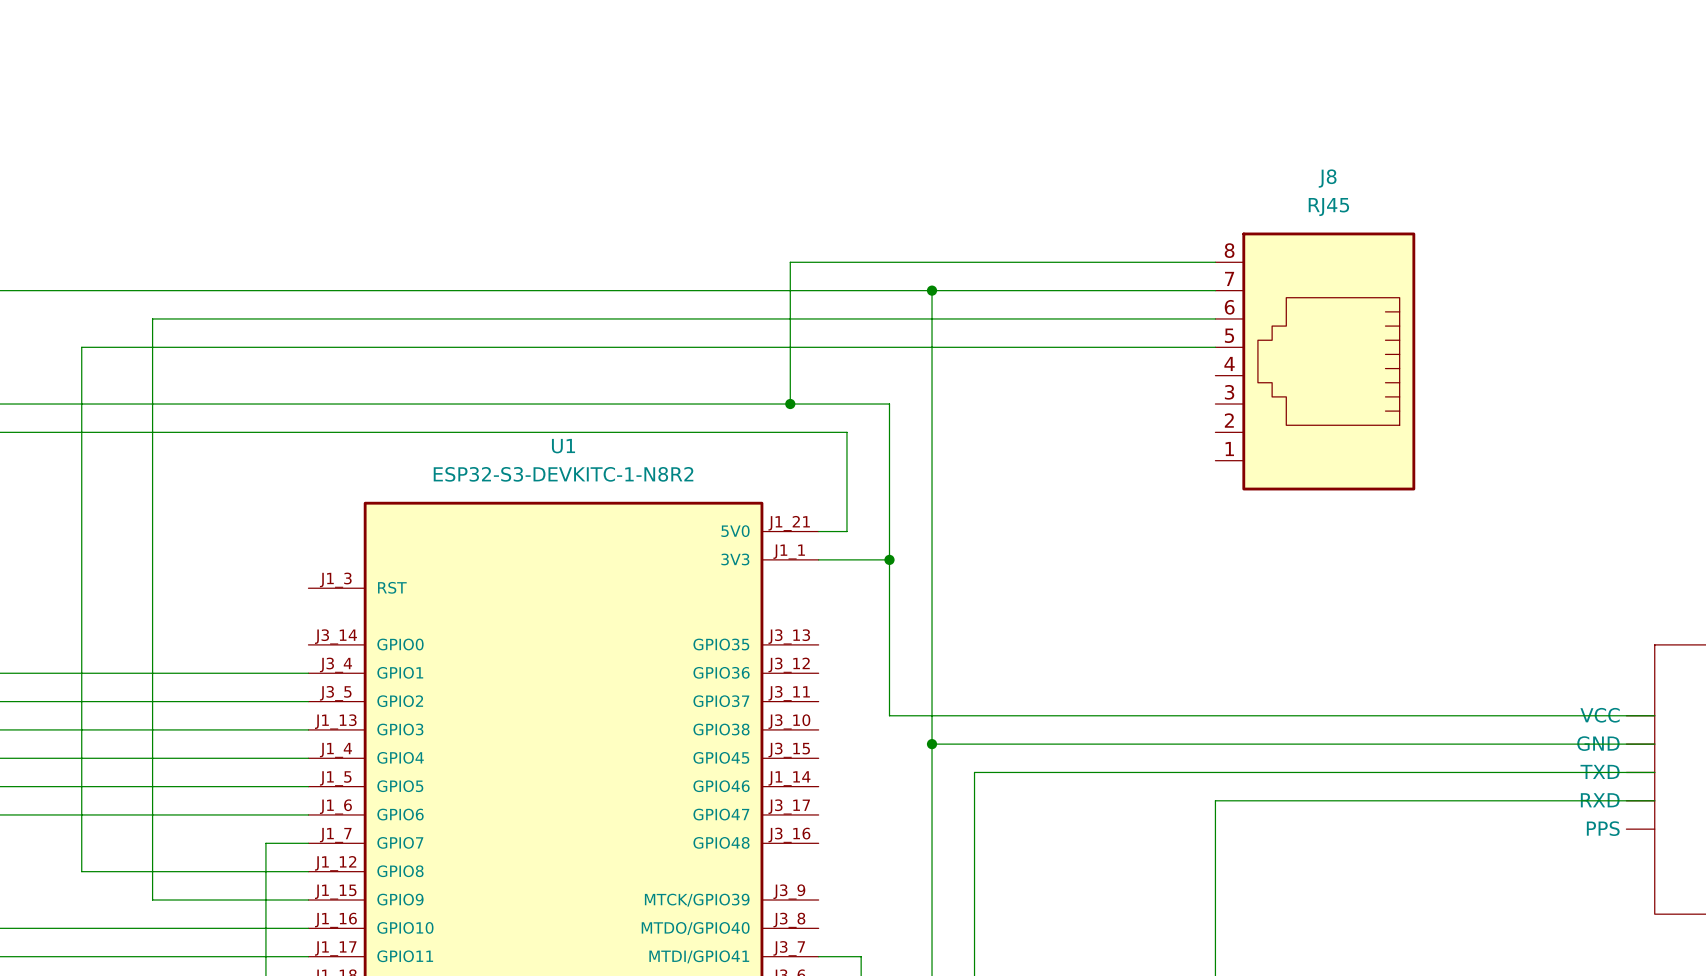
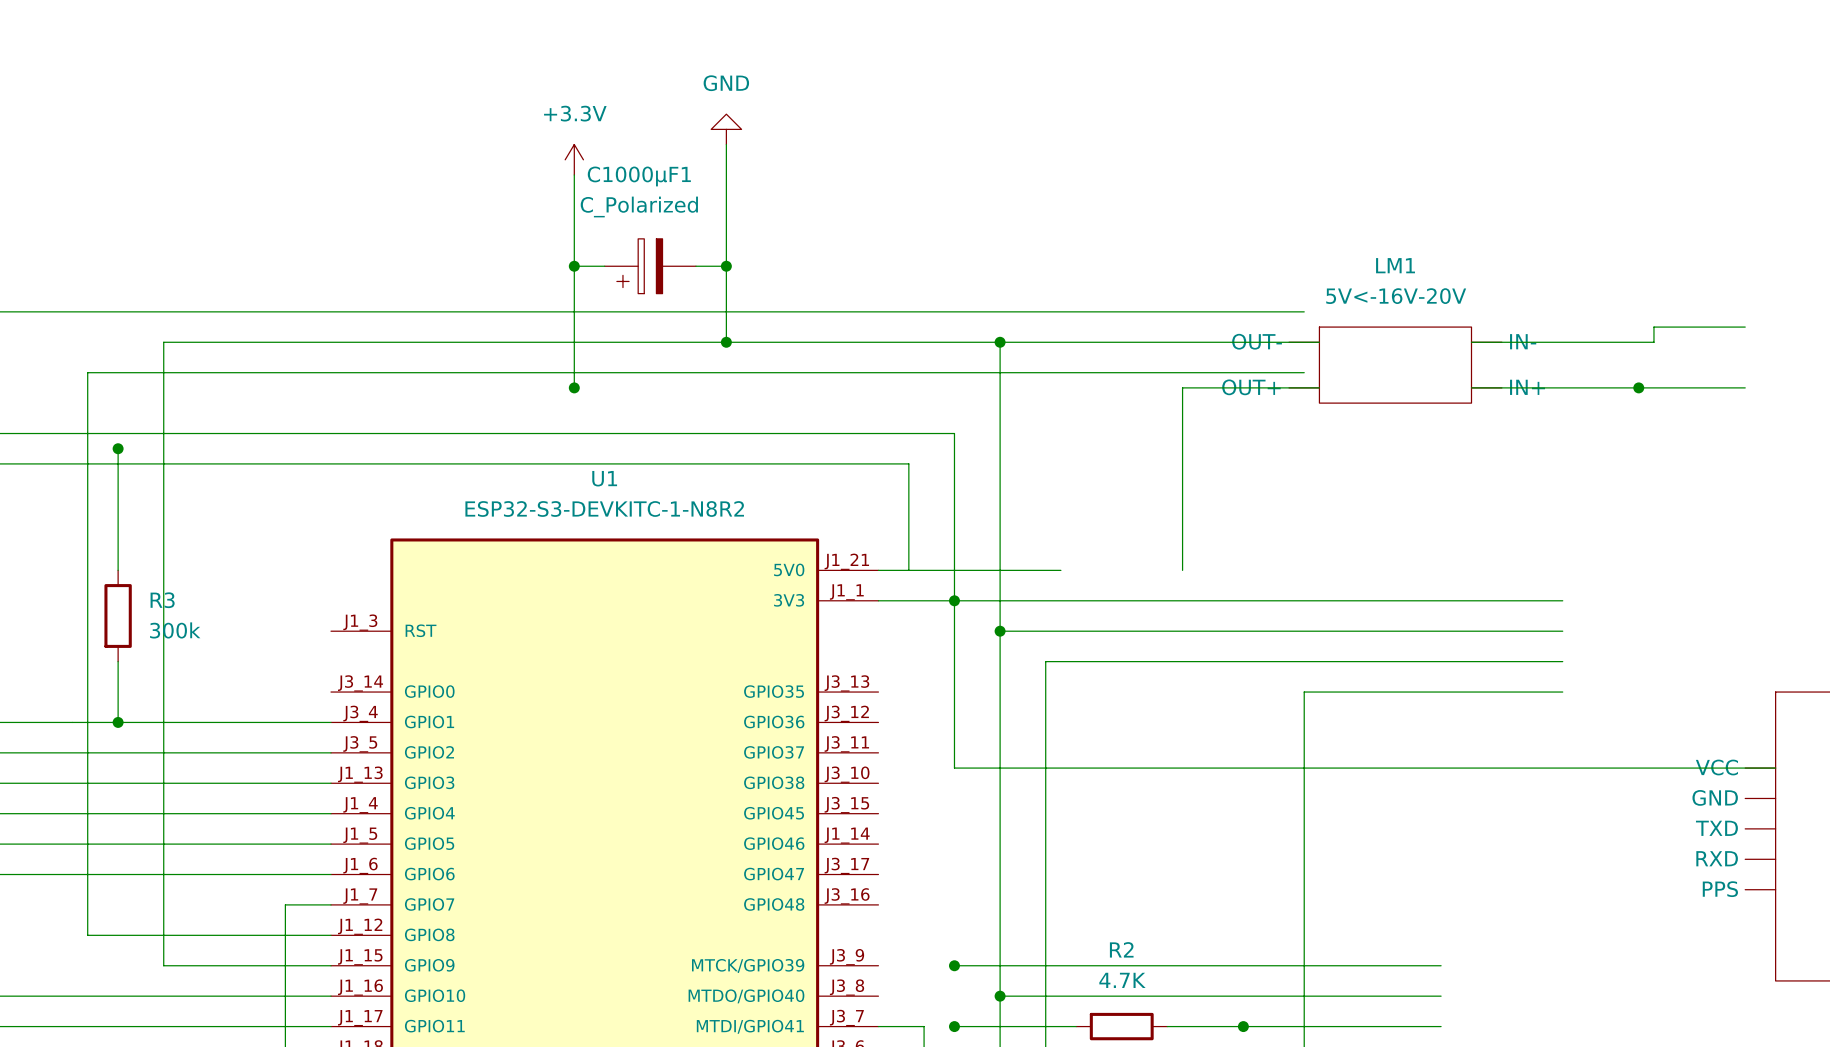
power symbol: none -> GND (726, 129)
wire: none -> (726, 144) (726, 342)
power symbol: none -> +3.3V (574, 159)
wire: none -> (574, 175) (574, 387)
wire: none -> (574, 266) (604, 266)
junction: none -> (574, 266)
C1000µF1: none -> C_Polarized (650, 266)
wire: none -> (695, 266) (726, 266)
junction: none -> (726, 266)
wire: (1215, 262) (790, 262) (790, 404) -> none
wire: (932, 290) (932, 318) -> none
junction position: (932, 290) -> (1000, 342)
wire: none -> (1745, 327) (1653, 327) (1653, 342) (1471, 342)
junction: none -> (726, 342)
LM1: none -> 5V<-16V-20V (1395, 365)
junction: none -> (574, 387)
wire: none -> (1319, 387) (1182, 387) (1182, 570)
J8: RJ45 (1315, 361) -> none
wire: none -> (1471, 387) (1745, 387)
junction: none -> (1638, 387)
junction: (790, 404) -> none
wire: none -> (118, 448) (118, 570)
junction: none -> (118, 448)
wire: none -> (908, 570) (1060, 570)
wire: none -> (954, 600) (1562, 600)
R3: none -> 300k (118, 615)
wire: none -> (1000, 631) (1562, 631)
junction: none -> (1000, 631)
wire: none -> (118, 661) (118, 722)
junction: none -> (118, 722)
wire: (932, 744) (1654, 744) -> none
junction: (932, 744) -> none
wire: (974, 772) (1654, 772) -> (1045, 828) (1045, 661) (1562, 661)
wire: (1215, 800) (1654, 800) -> (1304, 859) (1304, 692) (1562, 692)
wire: none -> (954, 965) (1441, 965)
junction: none -> (954, 965)
wire: none -> (1000, 996) (1441, 996)
junction: none -> (1000, 996)
wire: none -> (954, 1026) (1076, 1026)
junction: none -> (954, 1026)
R2: none -> 4.7K (1121, 1026)
wire: none -> (1167, 1026) (1441, 1026)
junction: none -> (1243, 1026)

